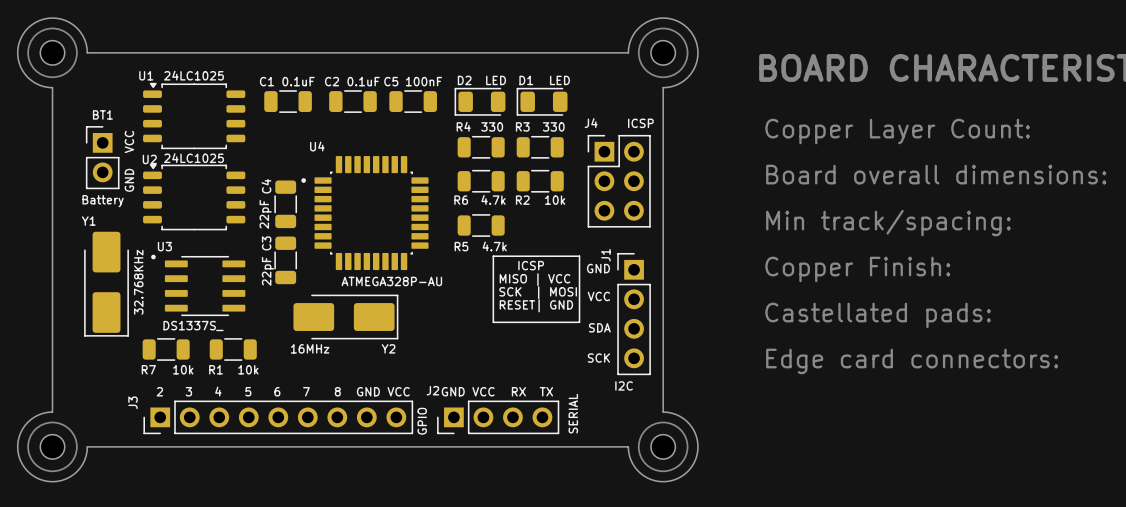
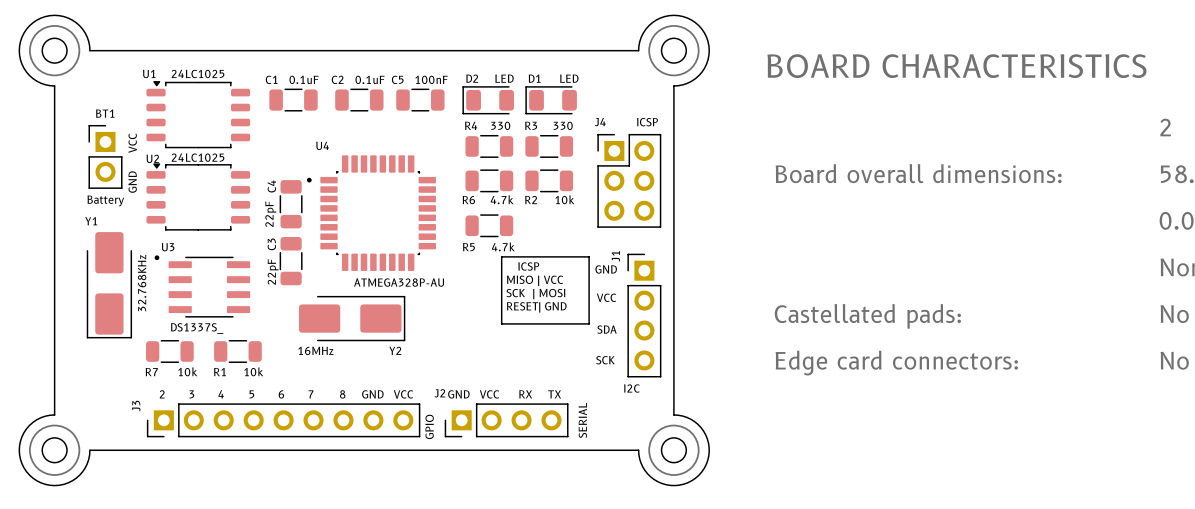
text: Copper Layer Count: (897, 131) -> none
text: Min track/spacing: (888, 223) -> none
text: Copper Finish: (857, 269) -> none

